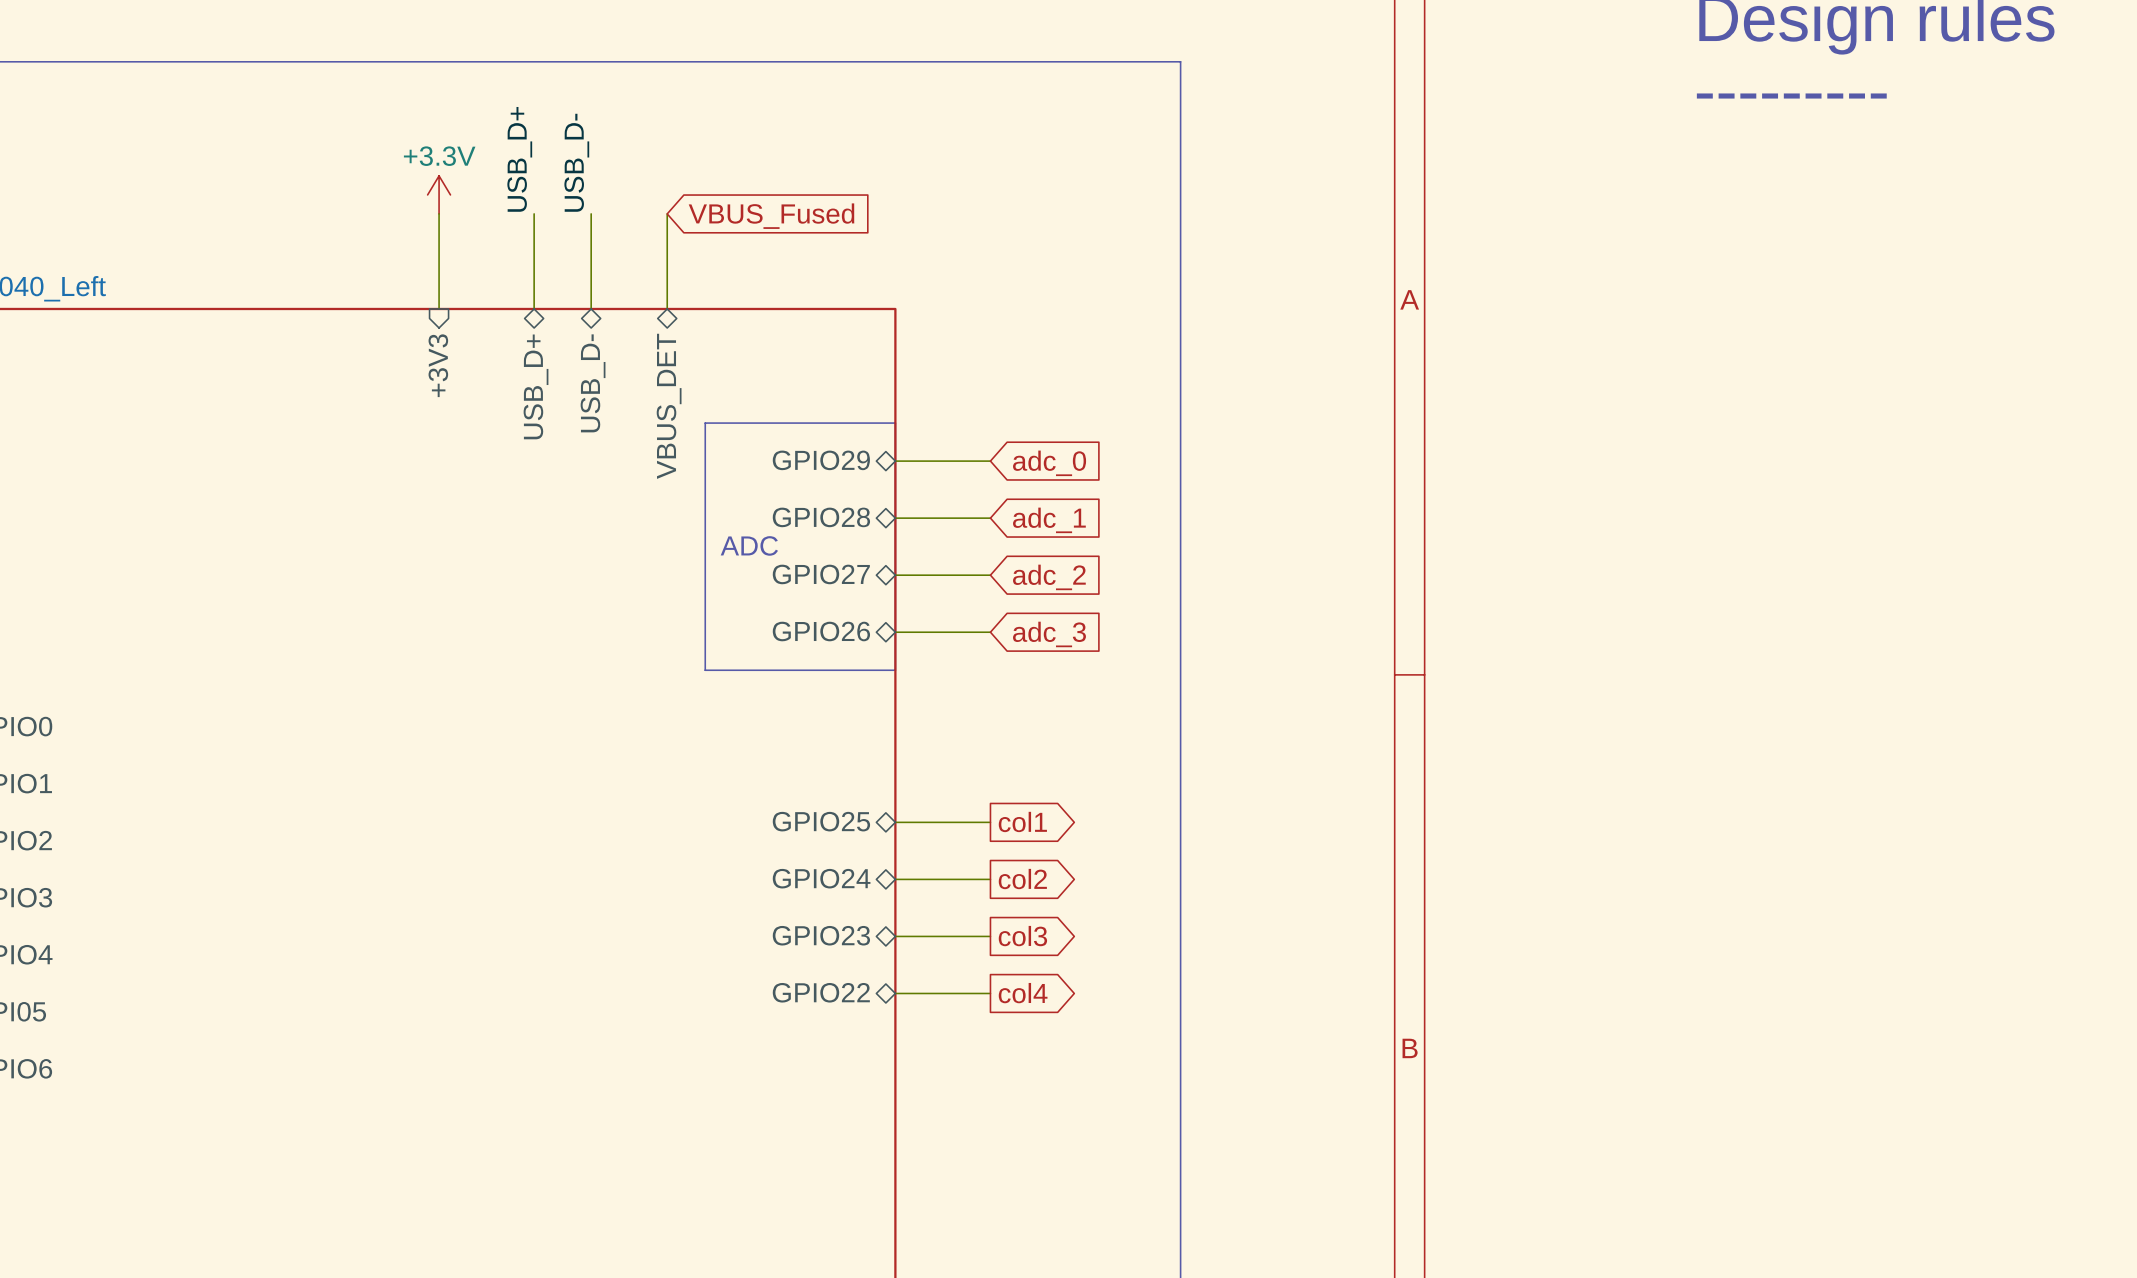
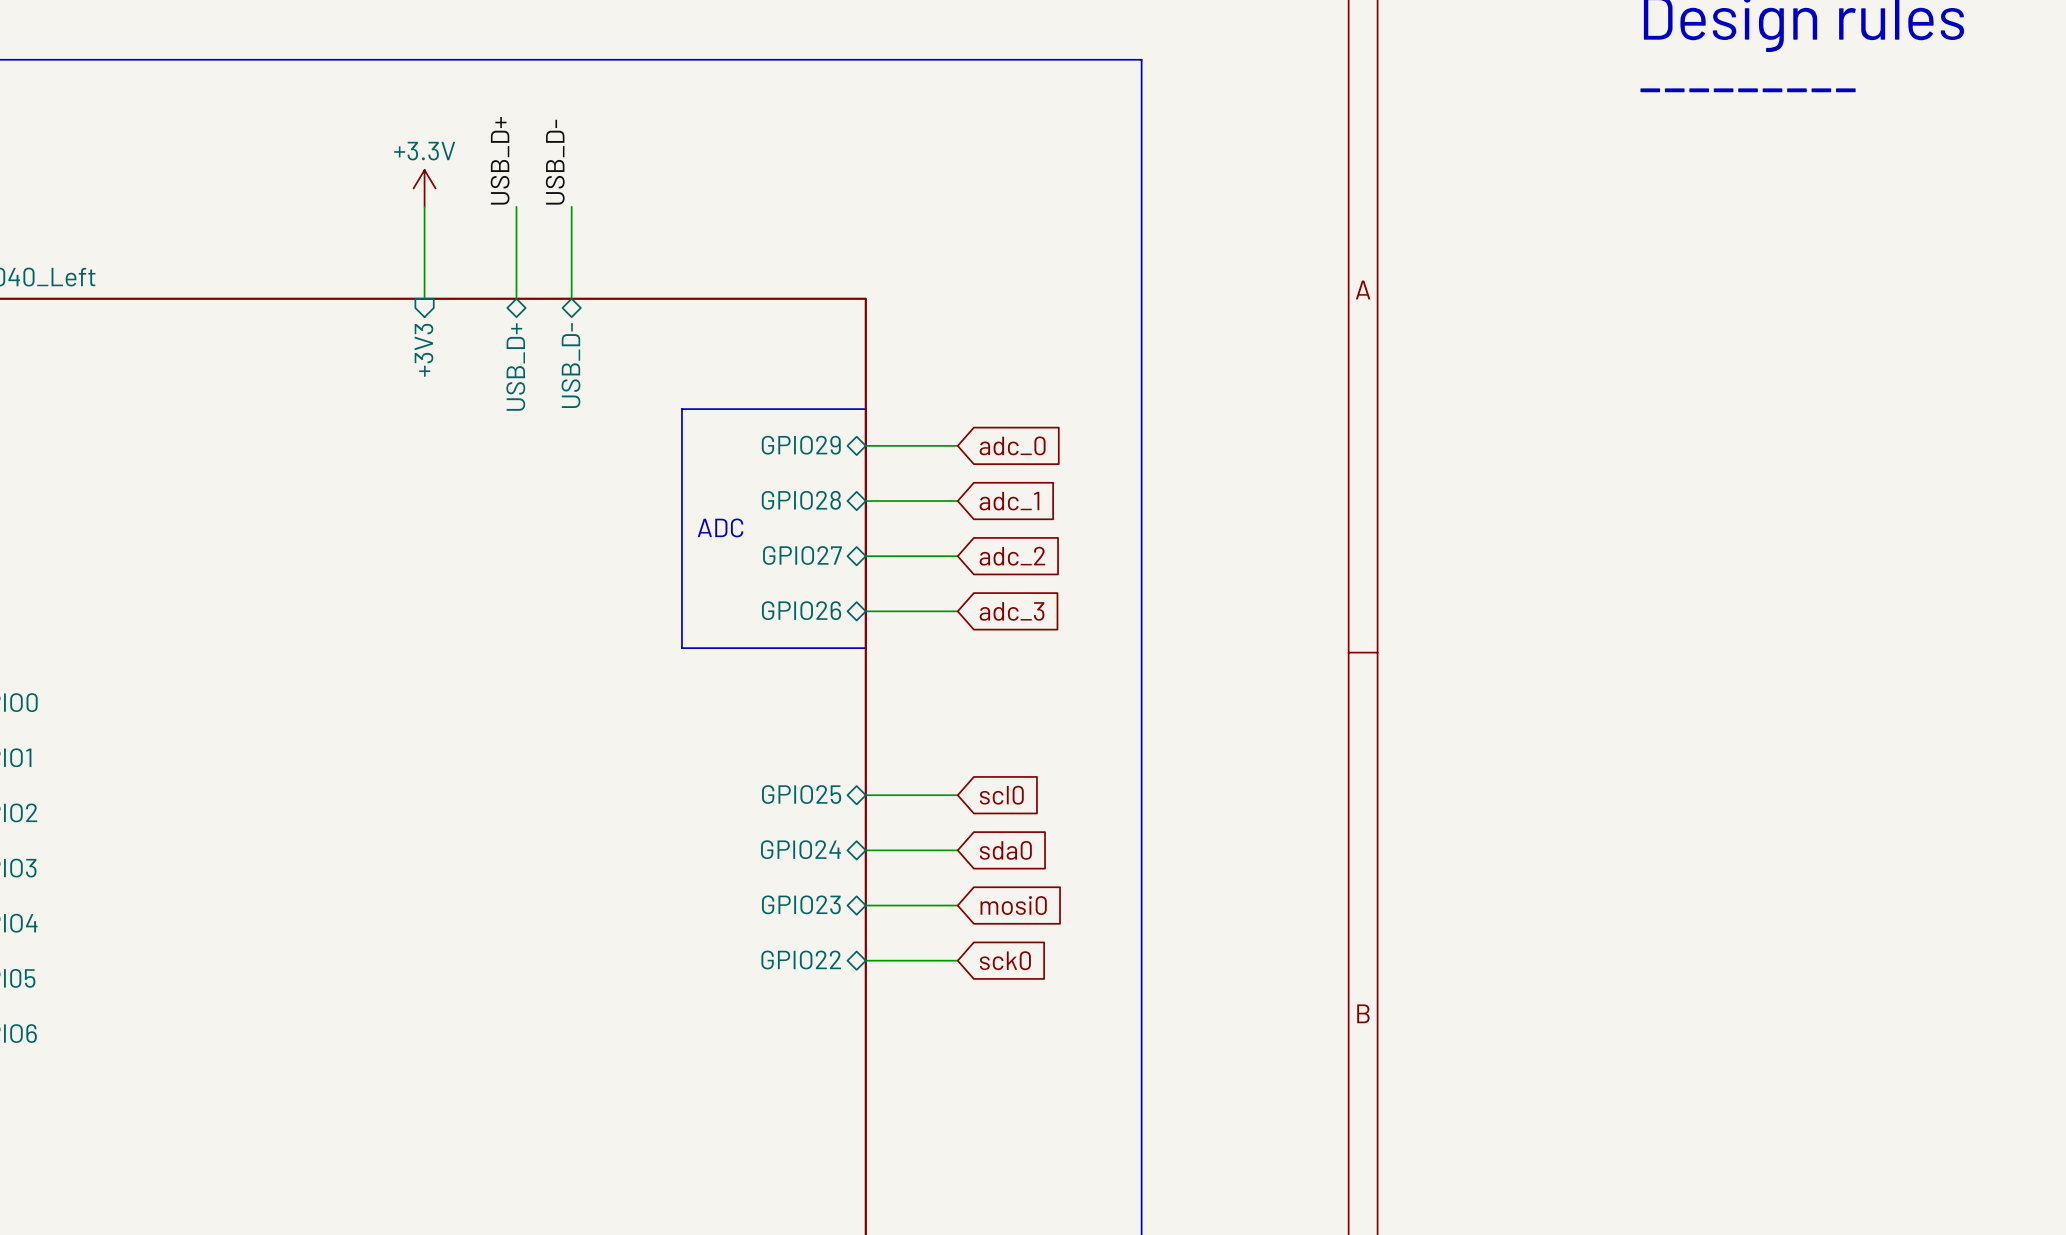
wire: (667, 213) (667, 308) -> none
global label: VBUS_Fused (771, 216) -> none
sheet pin: VBUS_DET (669, 406) -> none
global label shape: output (1022, 821) -> input (1001, 795)
global label: col1 (1022, 821) -> scl0 (1001, 795)
global label shape: output (1022, 879) -> input (1005, 850)
global label: col2 (1022, 879) -> sda0 (1005, 850)
global label shape: output (1022, 936) -> input (1013, 905)
global label: col3 (1022, 936) -> mosi0 (1013, 905)
global label shape: output (1023, 993) -> input (1005, 960)
global label: col4 (1023, 993) -> sck0 (1005, 960)

